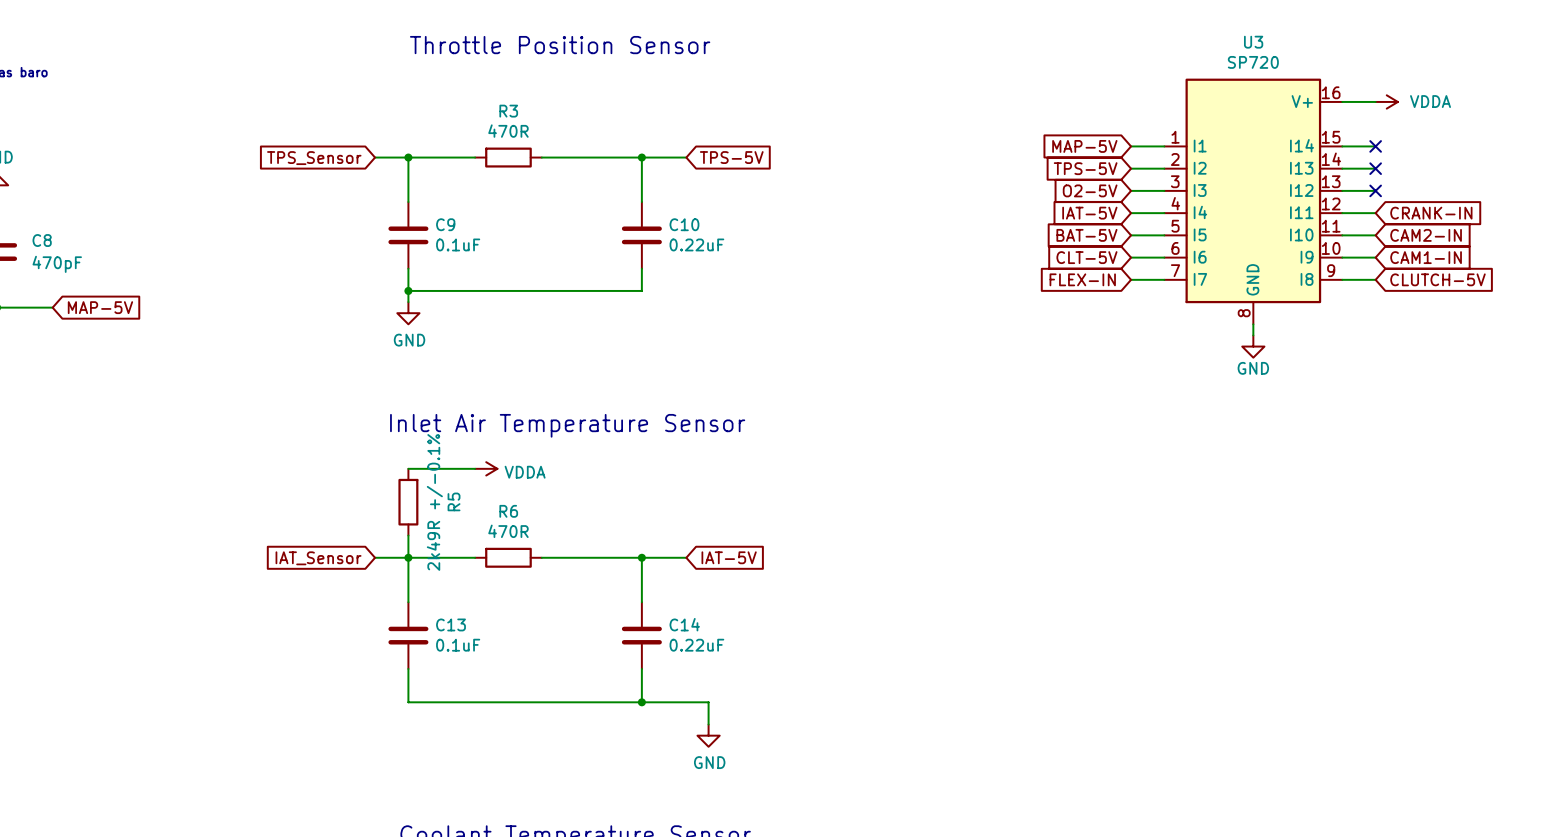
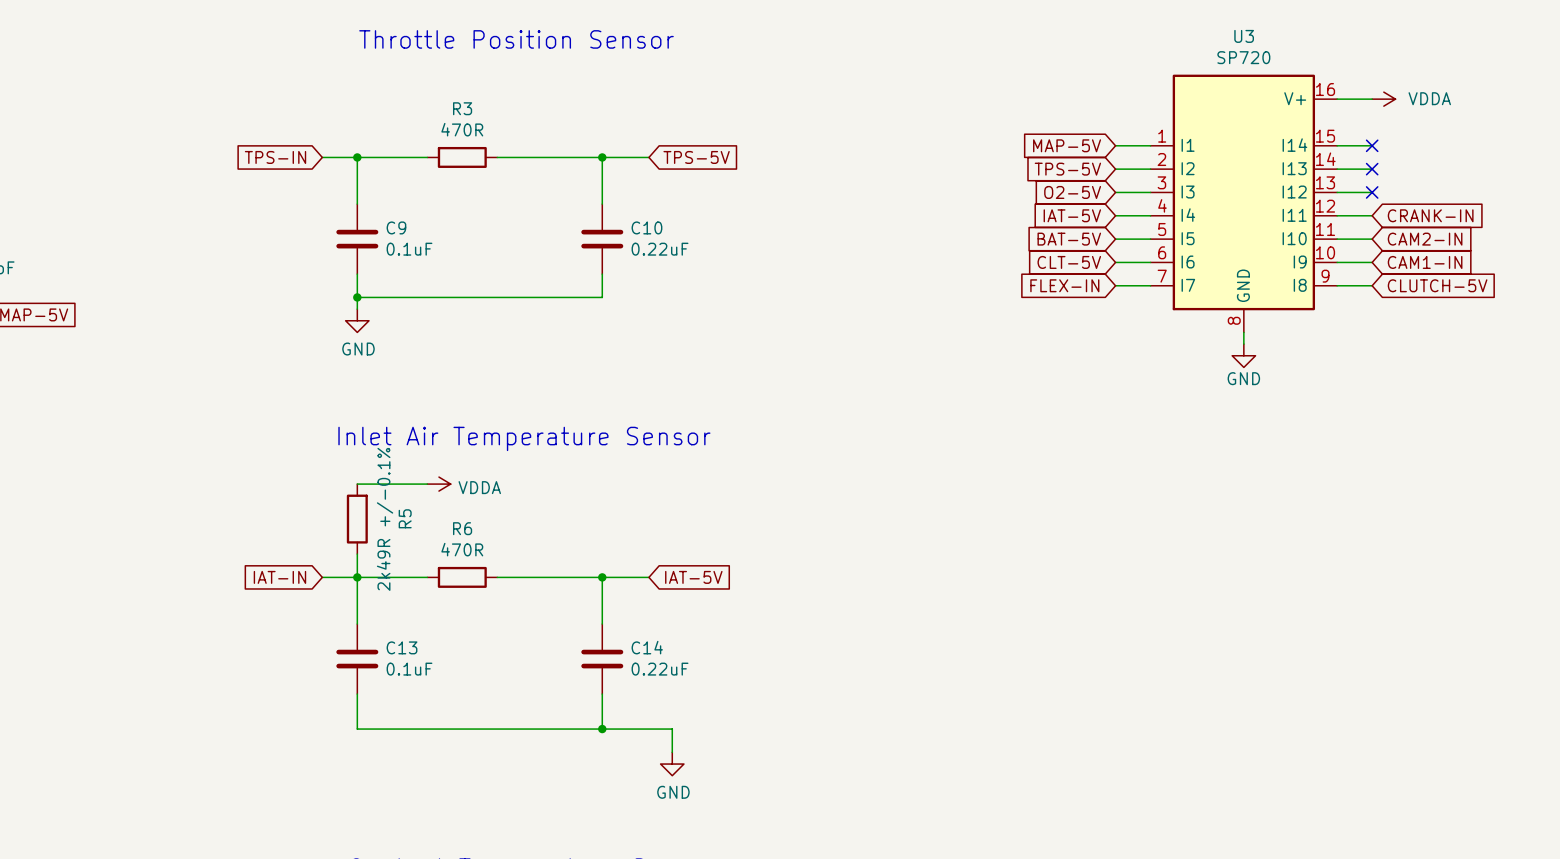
global label: TPS_Sensor (314, 158) -> TPS-IN (275, 157)
global label: IAT_Sensor (318, 558) -> IAT-IN (279, 577)

